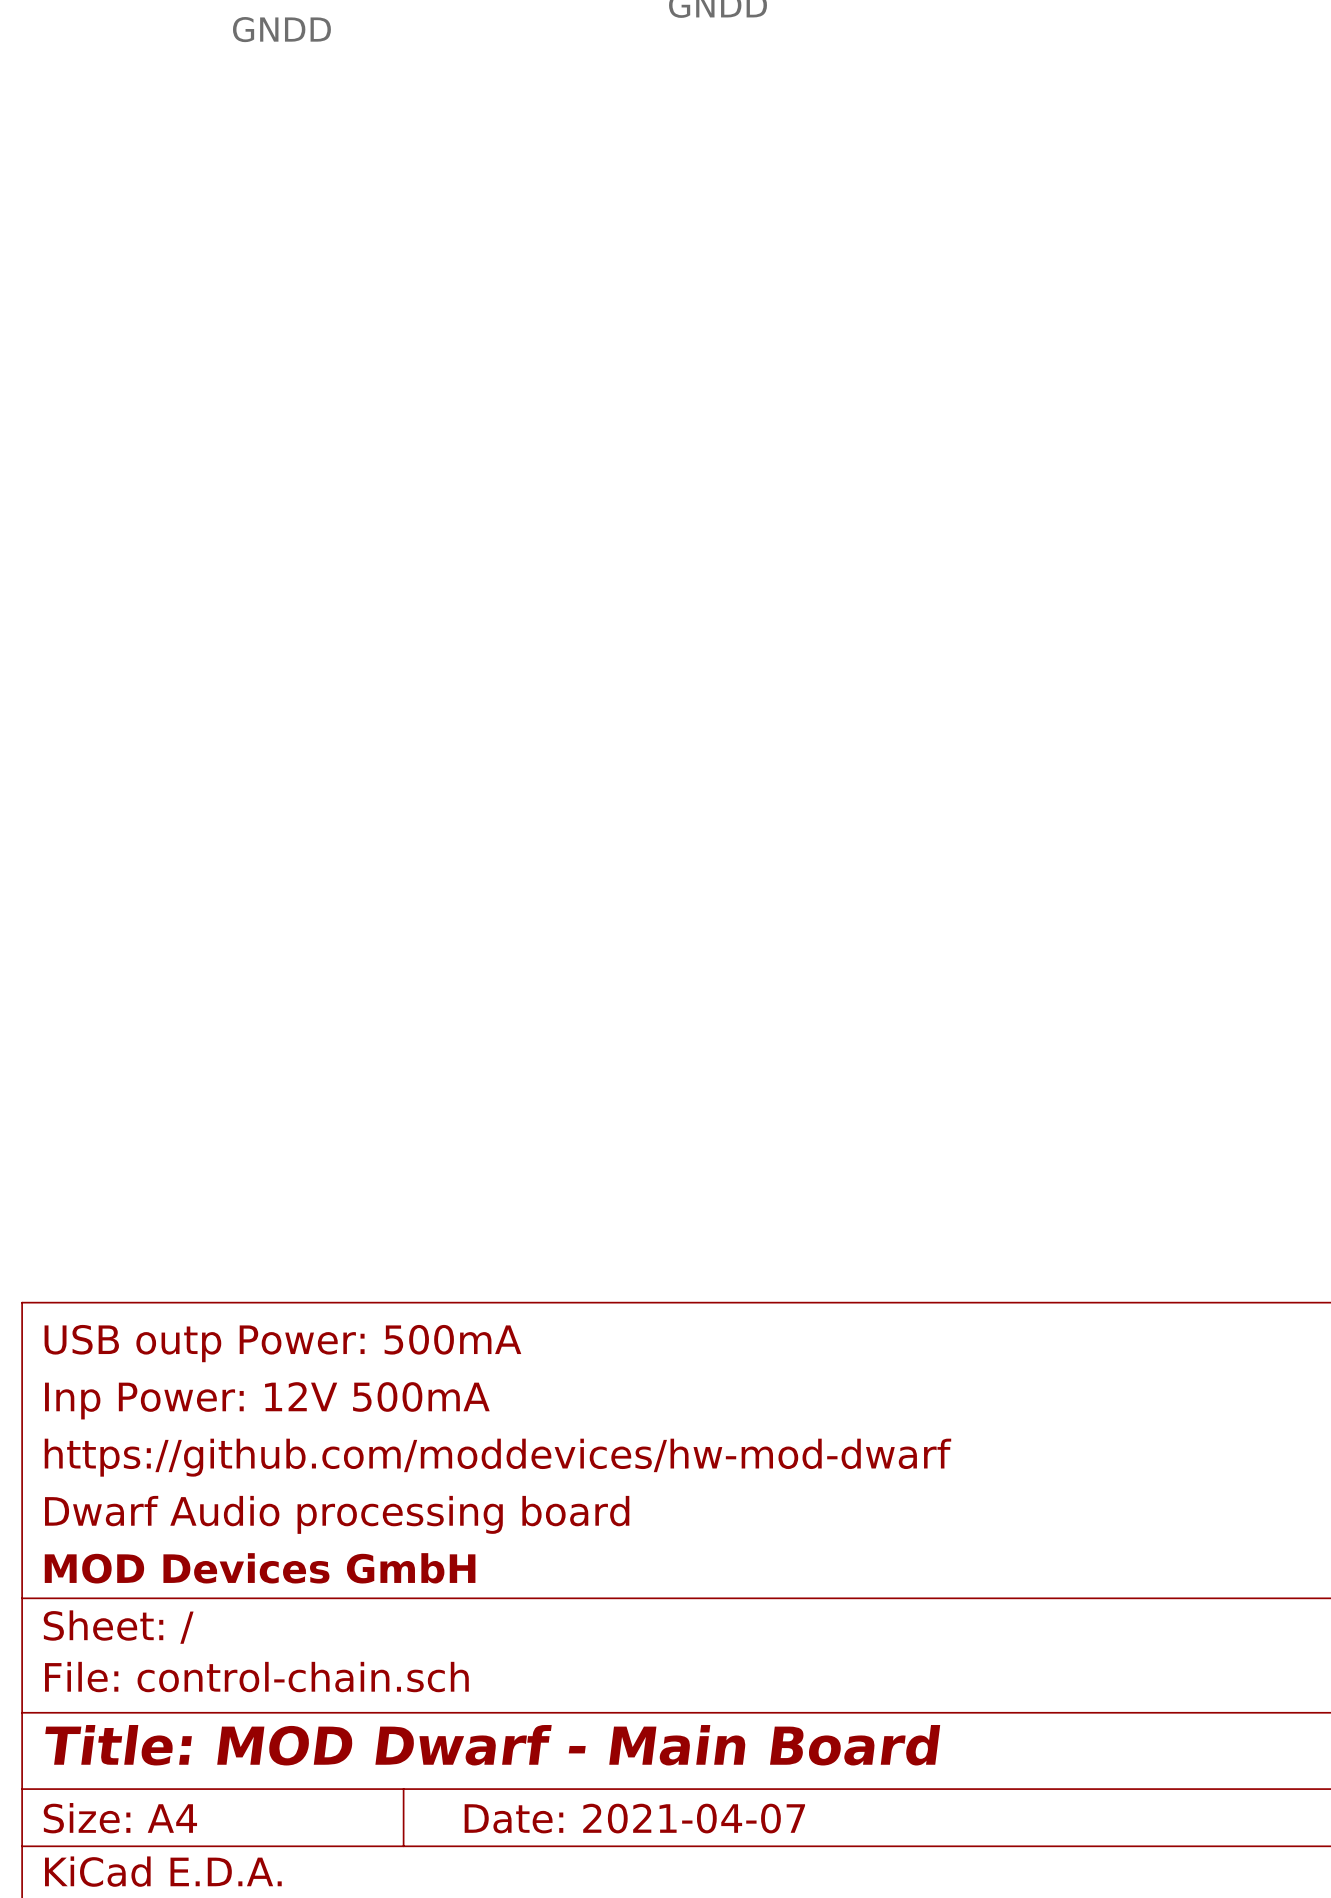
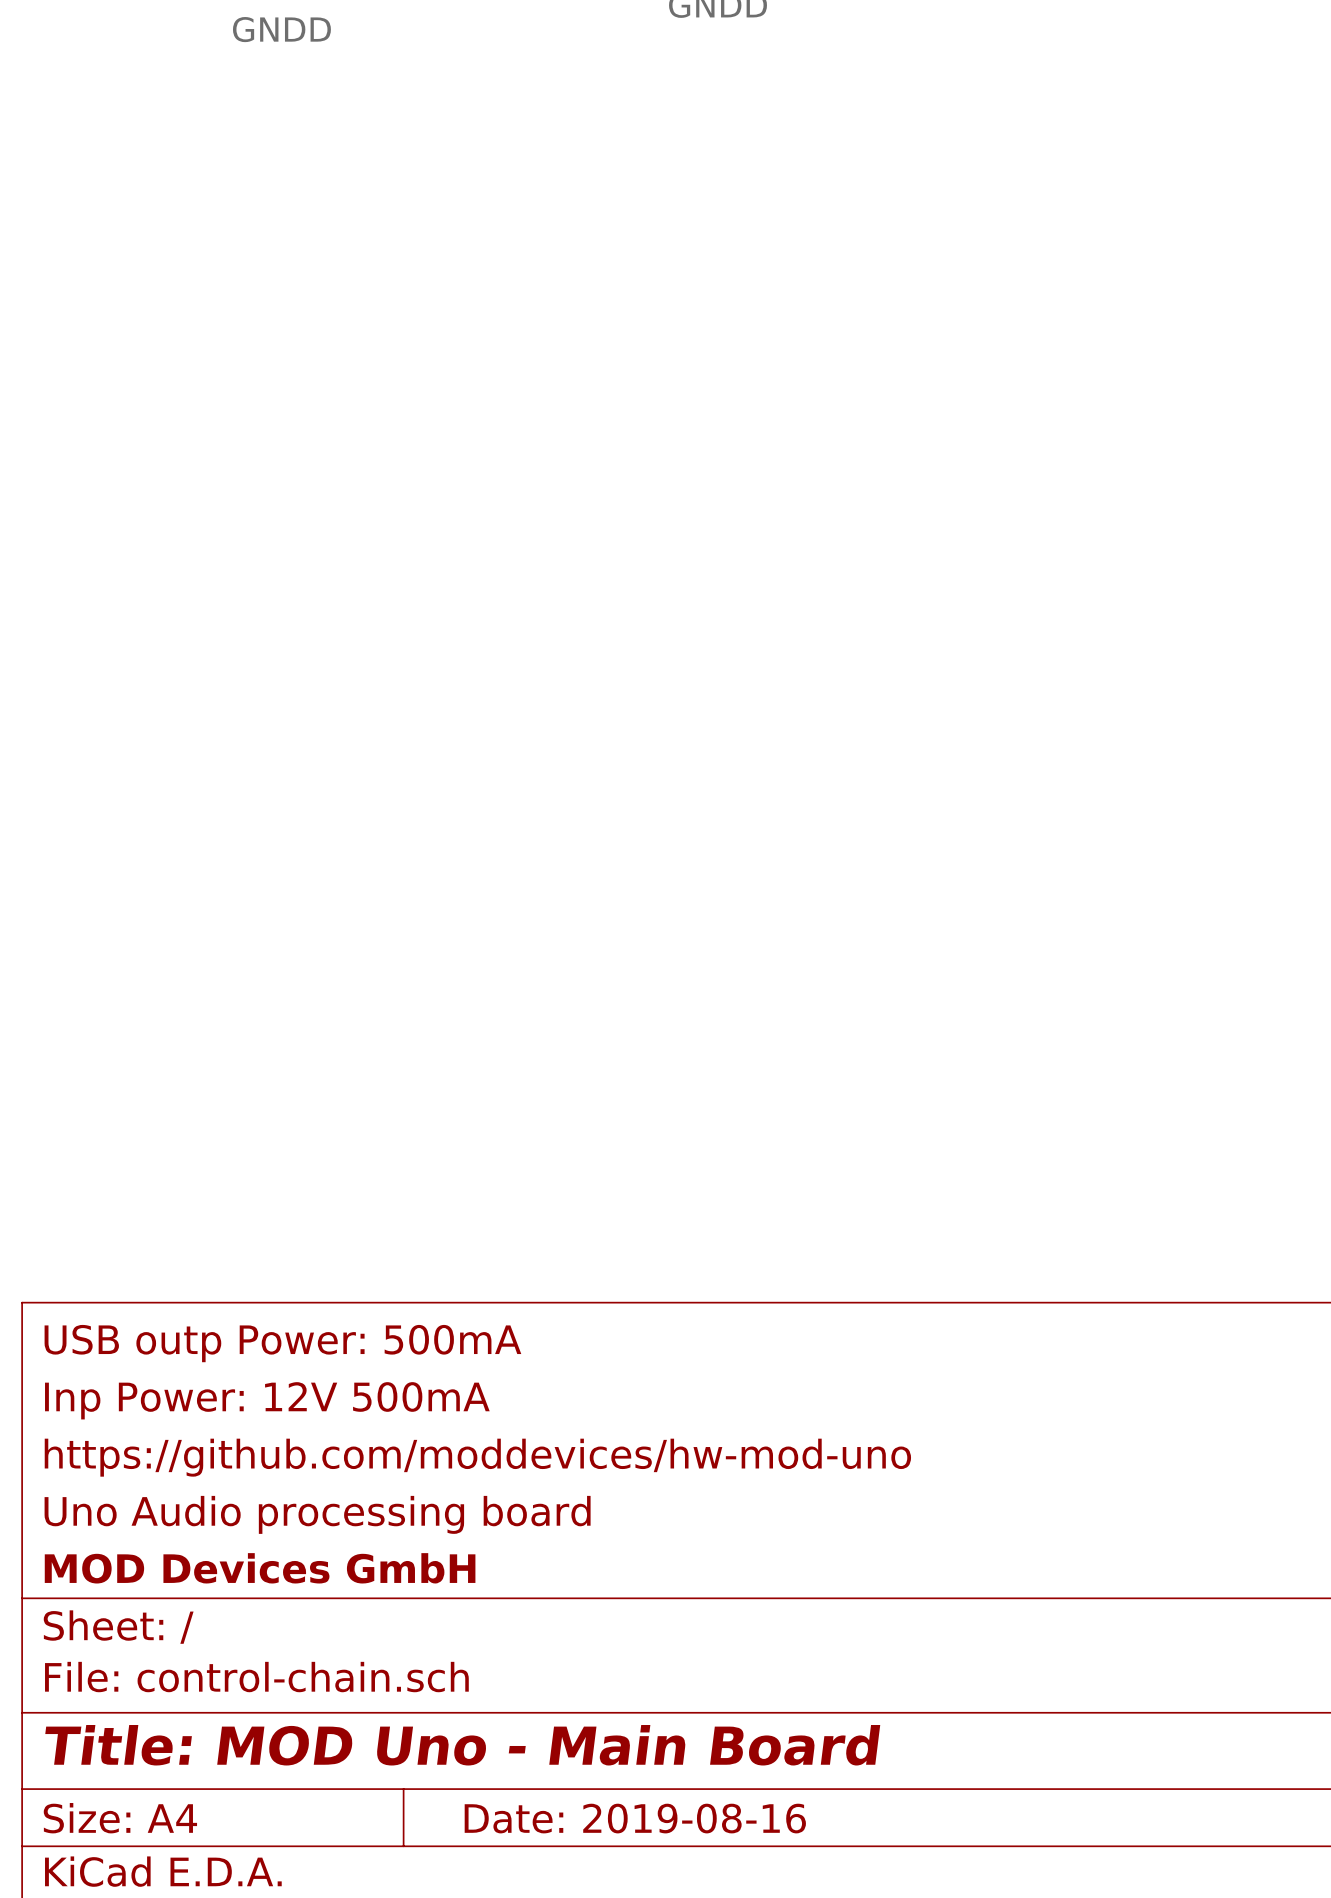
title block: https://github.com/moddevices/hw-mod-dwarf (497, 1457) -> https://github.com/moddevices/hw-mod-uno (477, 1457)
title block: Dwarf Audio processing board (337, 1514) -> Uno Audio processing board (317, 1514)
title block: Title: MOD Dwarf - Main Board (492, 1745) -> Title: MOD Uno - Main Board (462, 1745)
title block: Date: 2021-04-07 (634, 1818) -> Date: 2019-08-16 (635, 1818)

